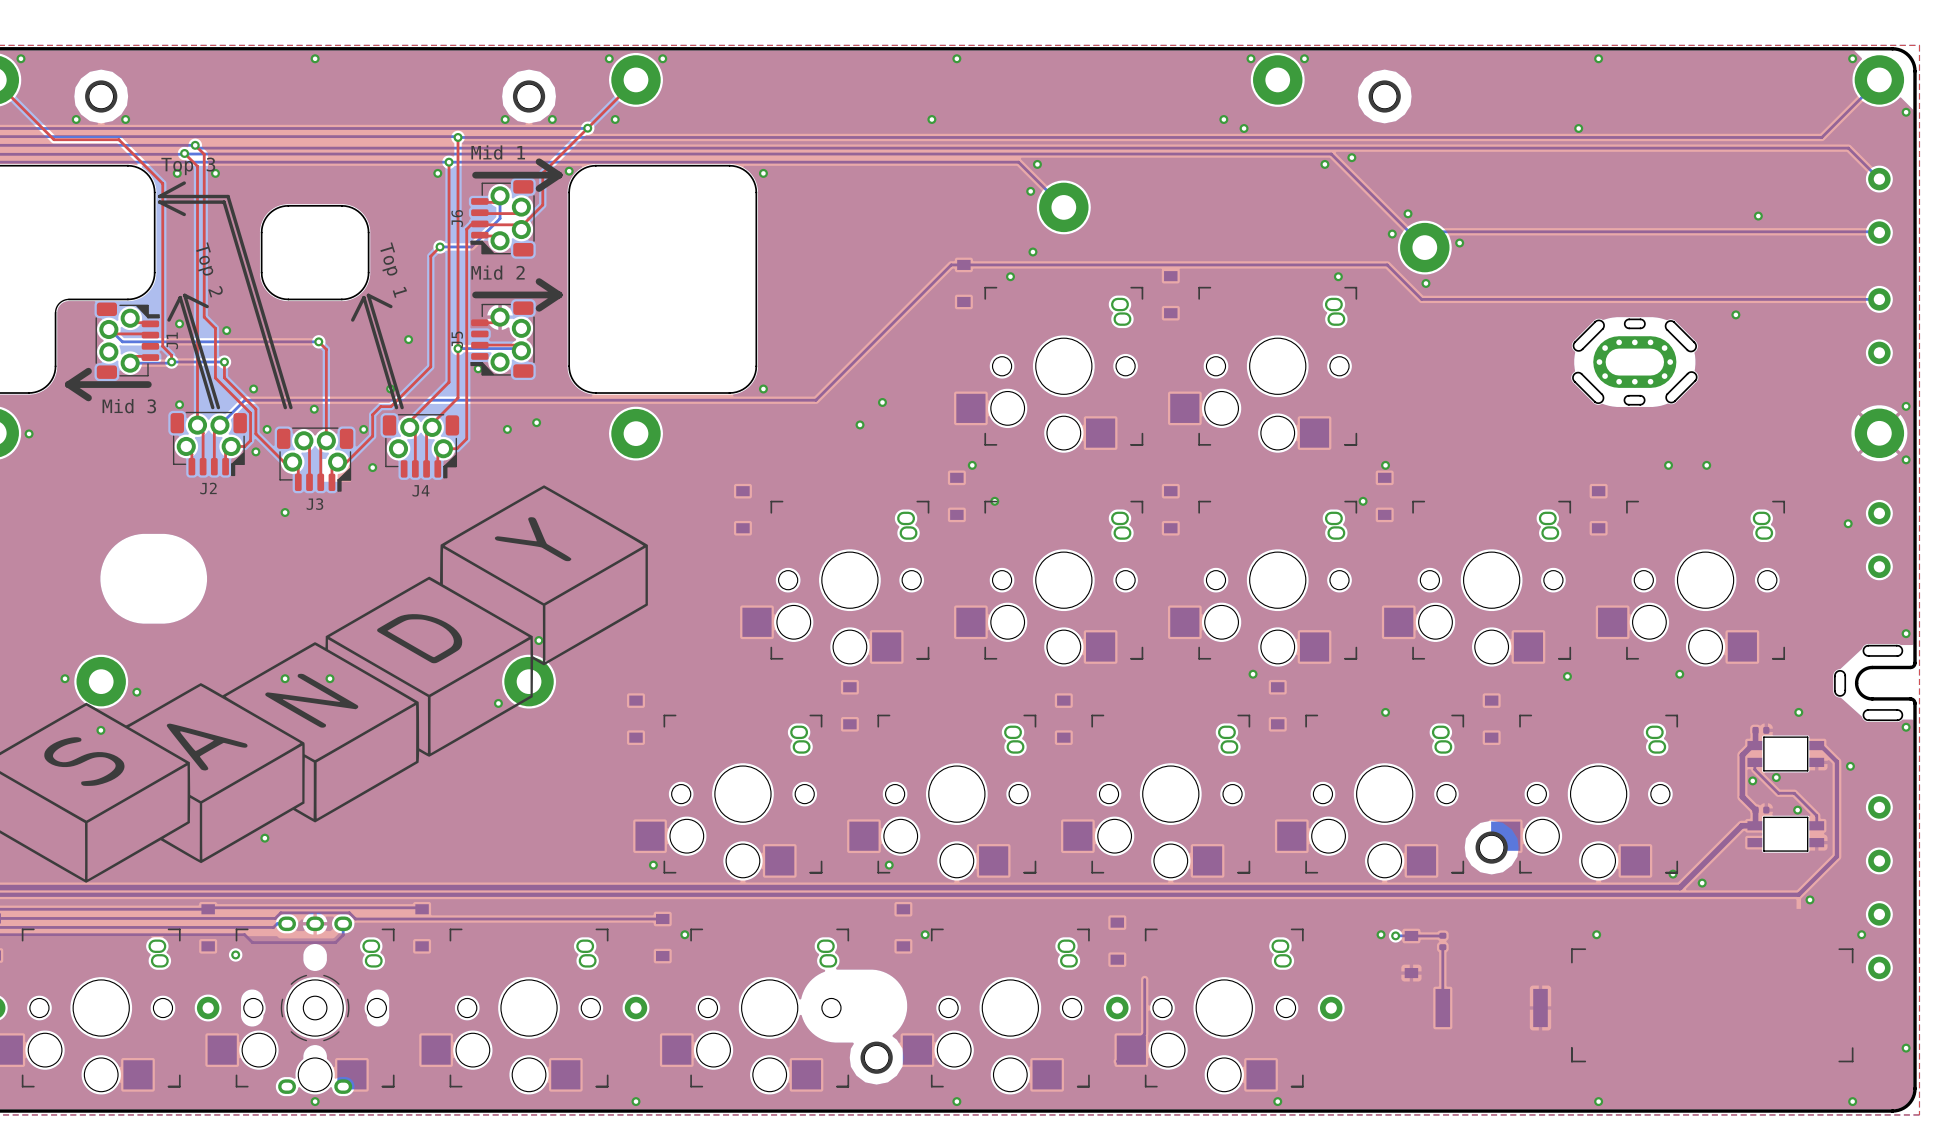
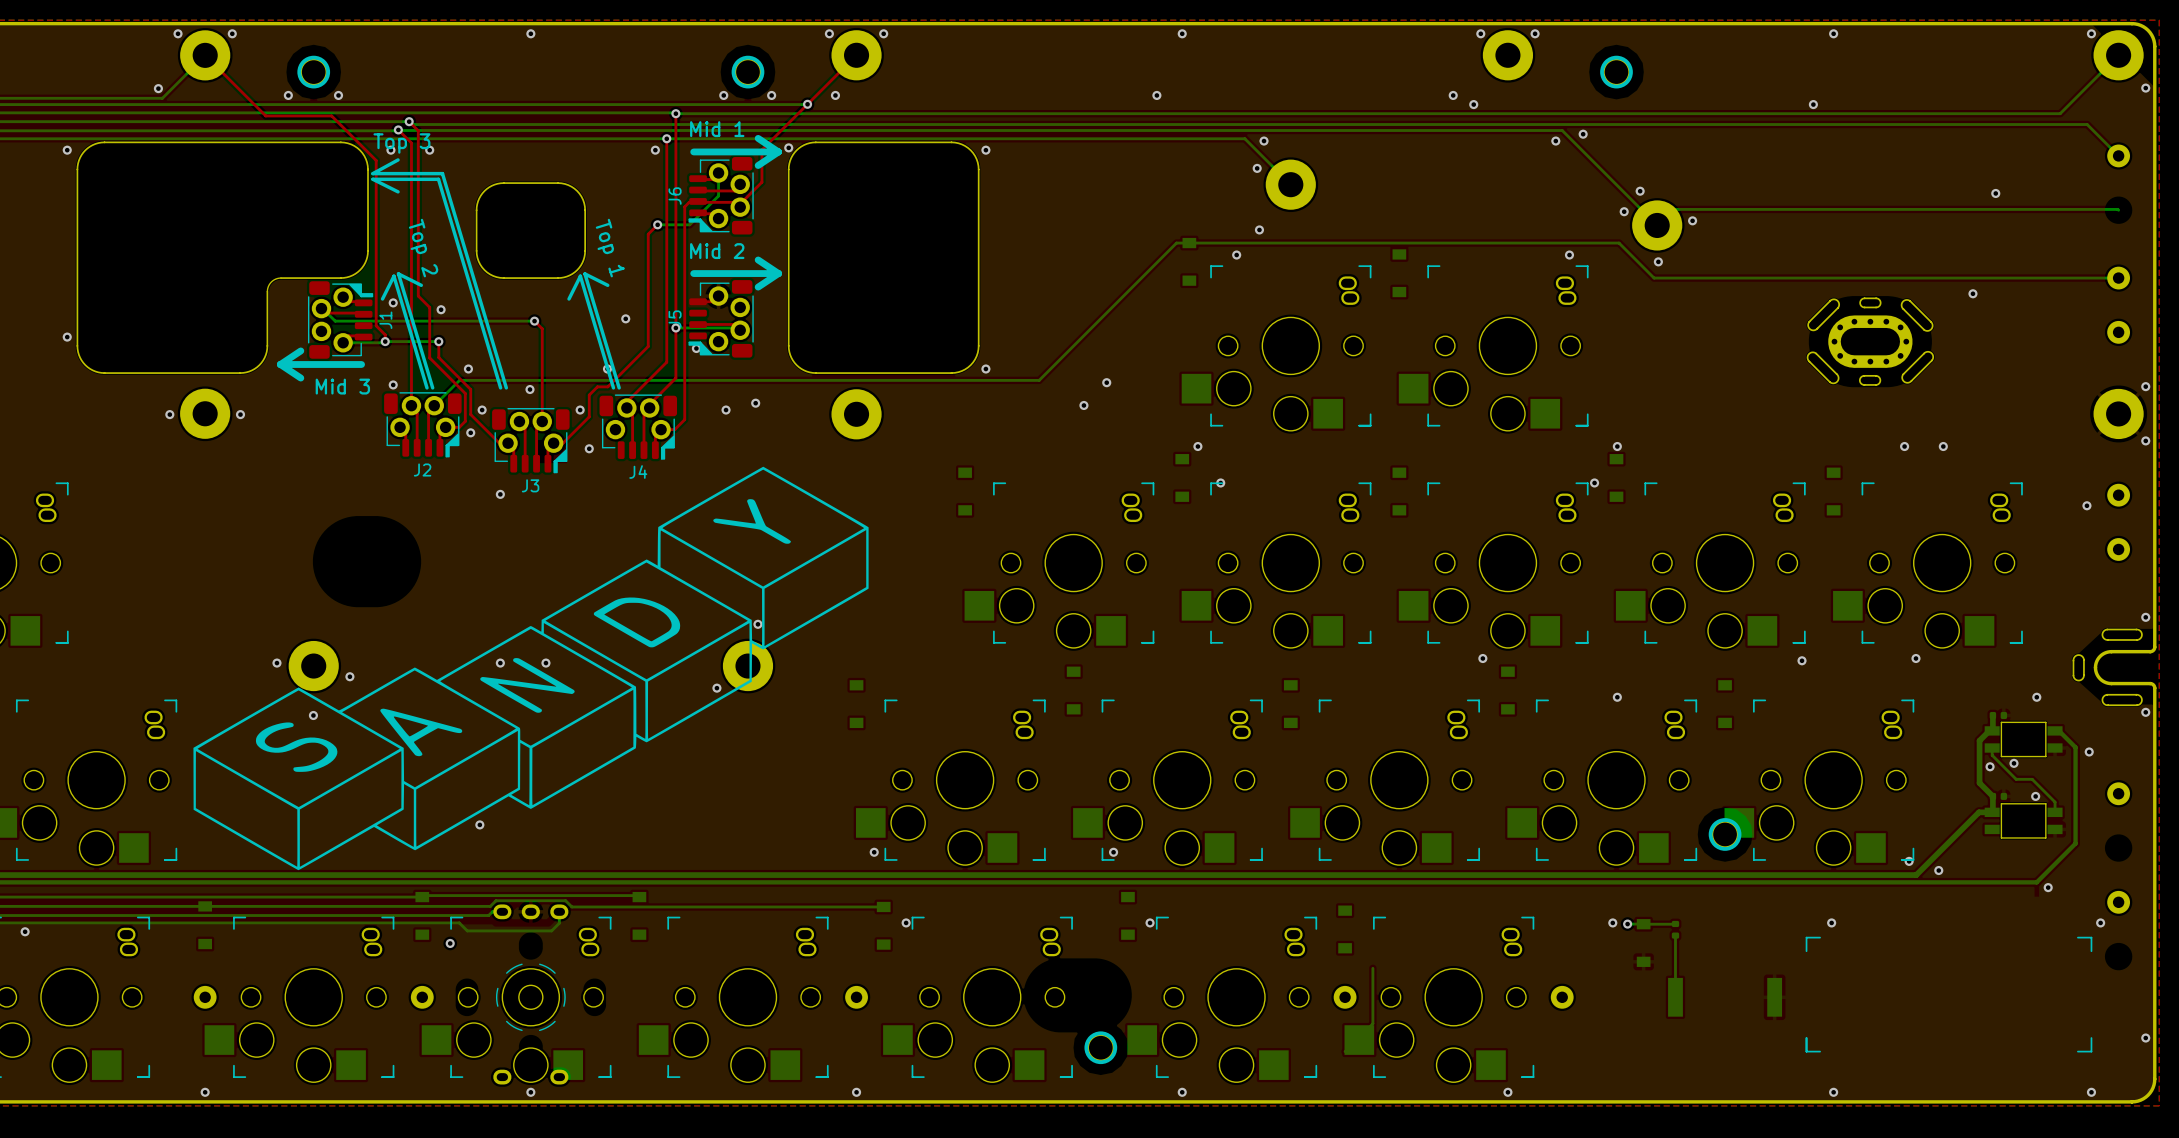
part: (1879, 232) -> none
part: (1879, 860) -> none
part: (1879, 967) -> none

